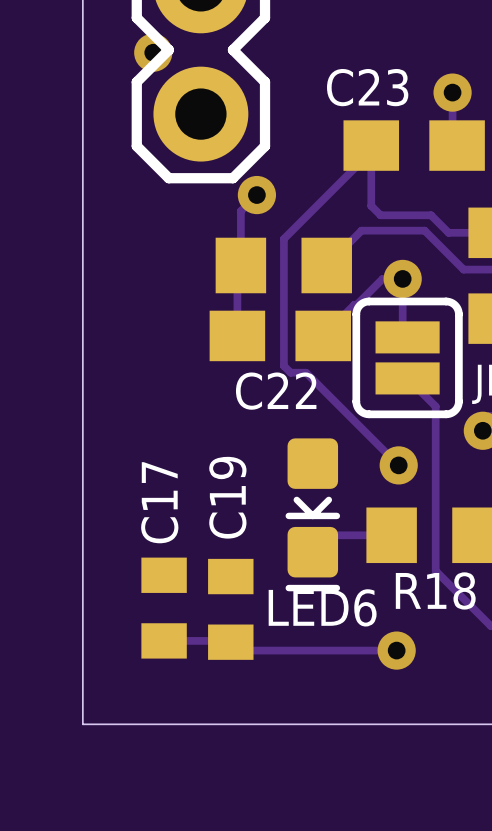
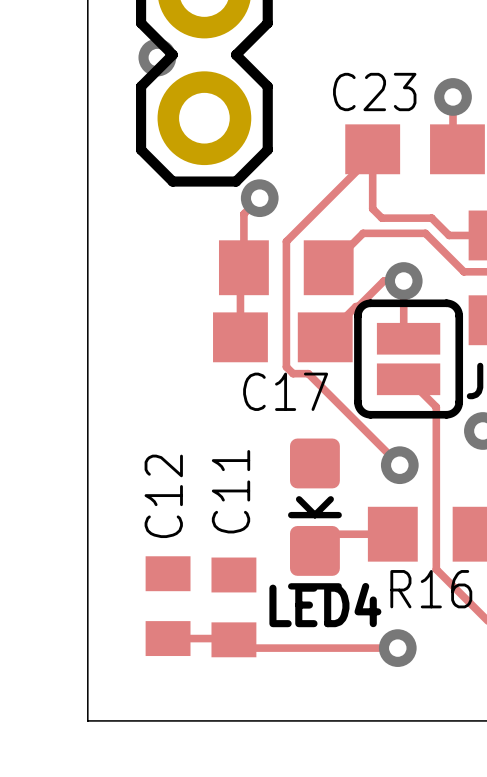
C22 name: C22 (276, 391) -> C17 (285, 391)
C19 name: C19 (227, 497) -> C11 (231, 491)
C17 name: C17 (159, 502) -> C12 (163, 496)
R18 name: R18 (435, 590) -> R16 (431, 589)
LED6 name: LED6 (322, 607) -> LED4 (325, 605)

